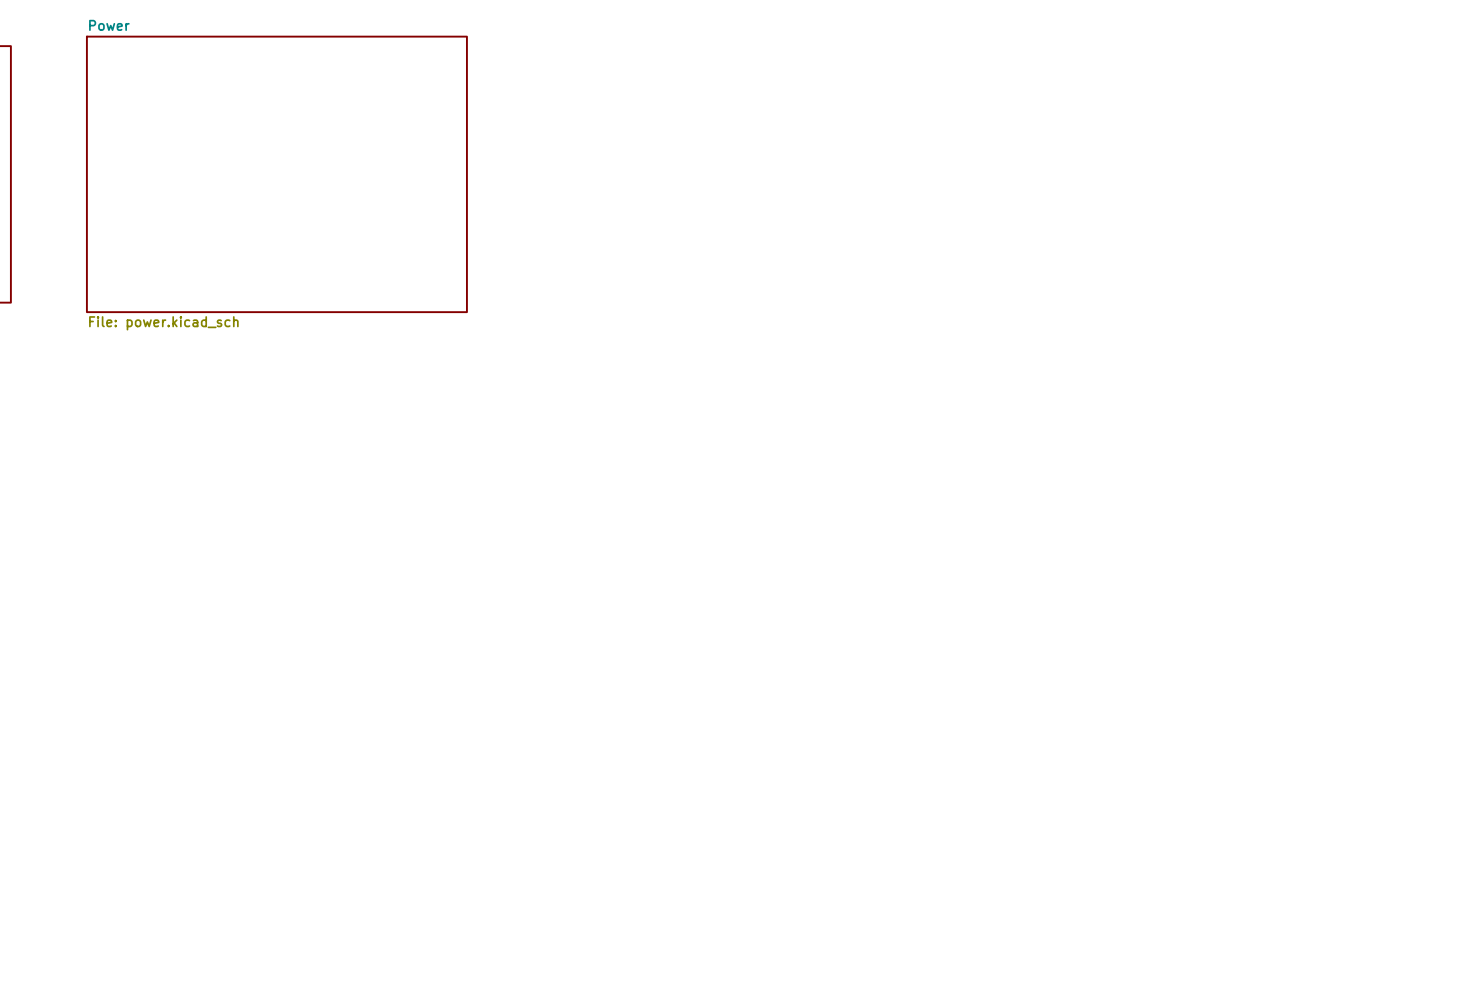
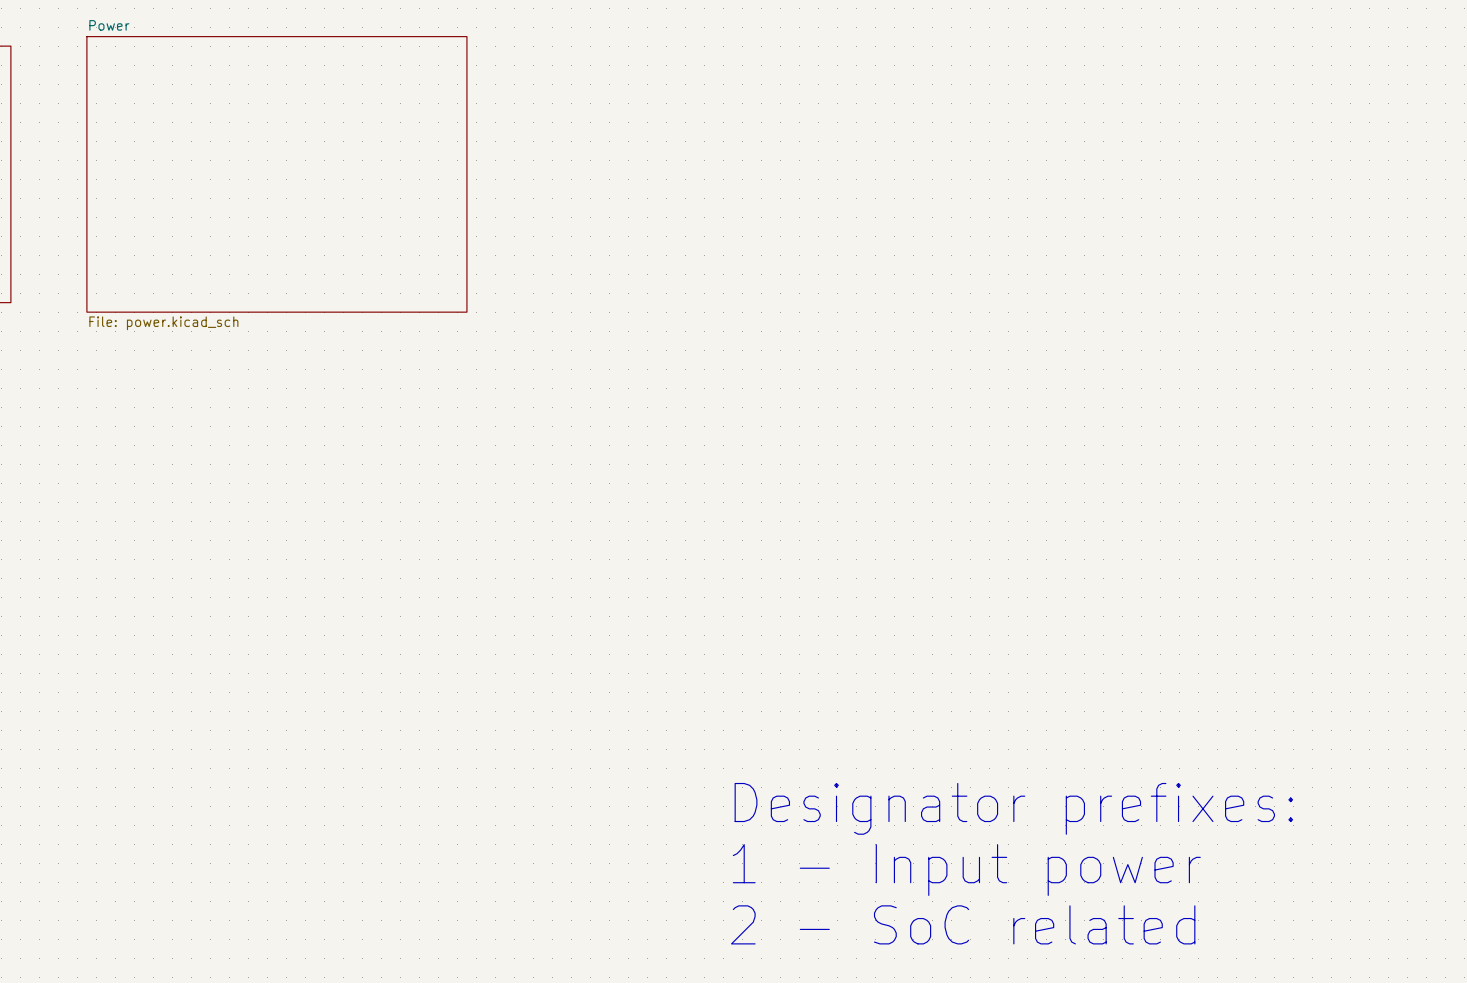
text: none -> Designator prefixes: (1013, 808)
text: none -> 1 - Input power (966, 870)
text: none -> 2 - SoC related (963, 924)

